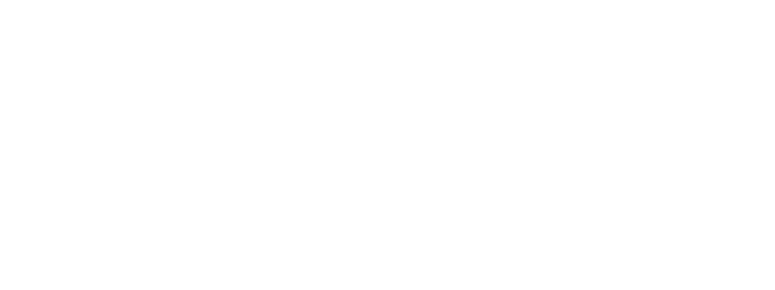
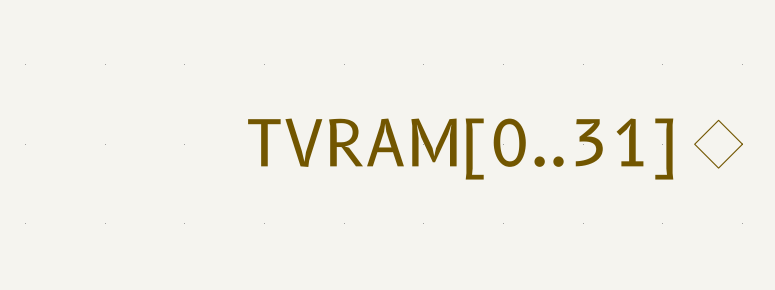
hierarchical label: none -> TVRAM[0..31] (460, 149)

